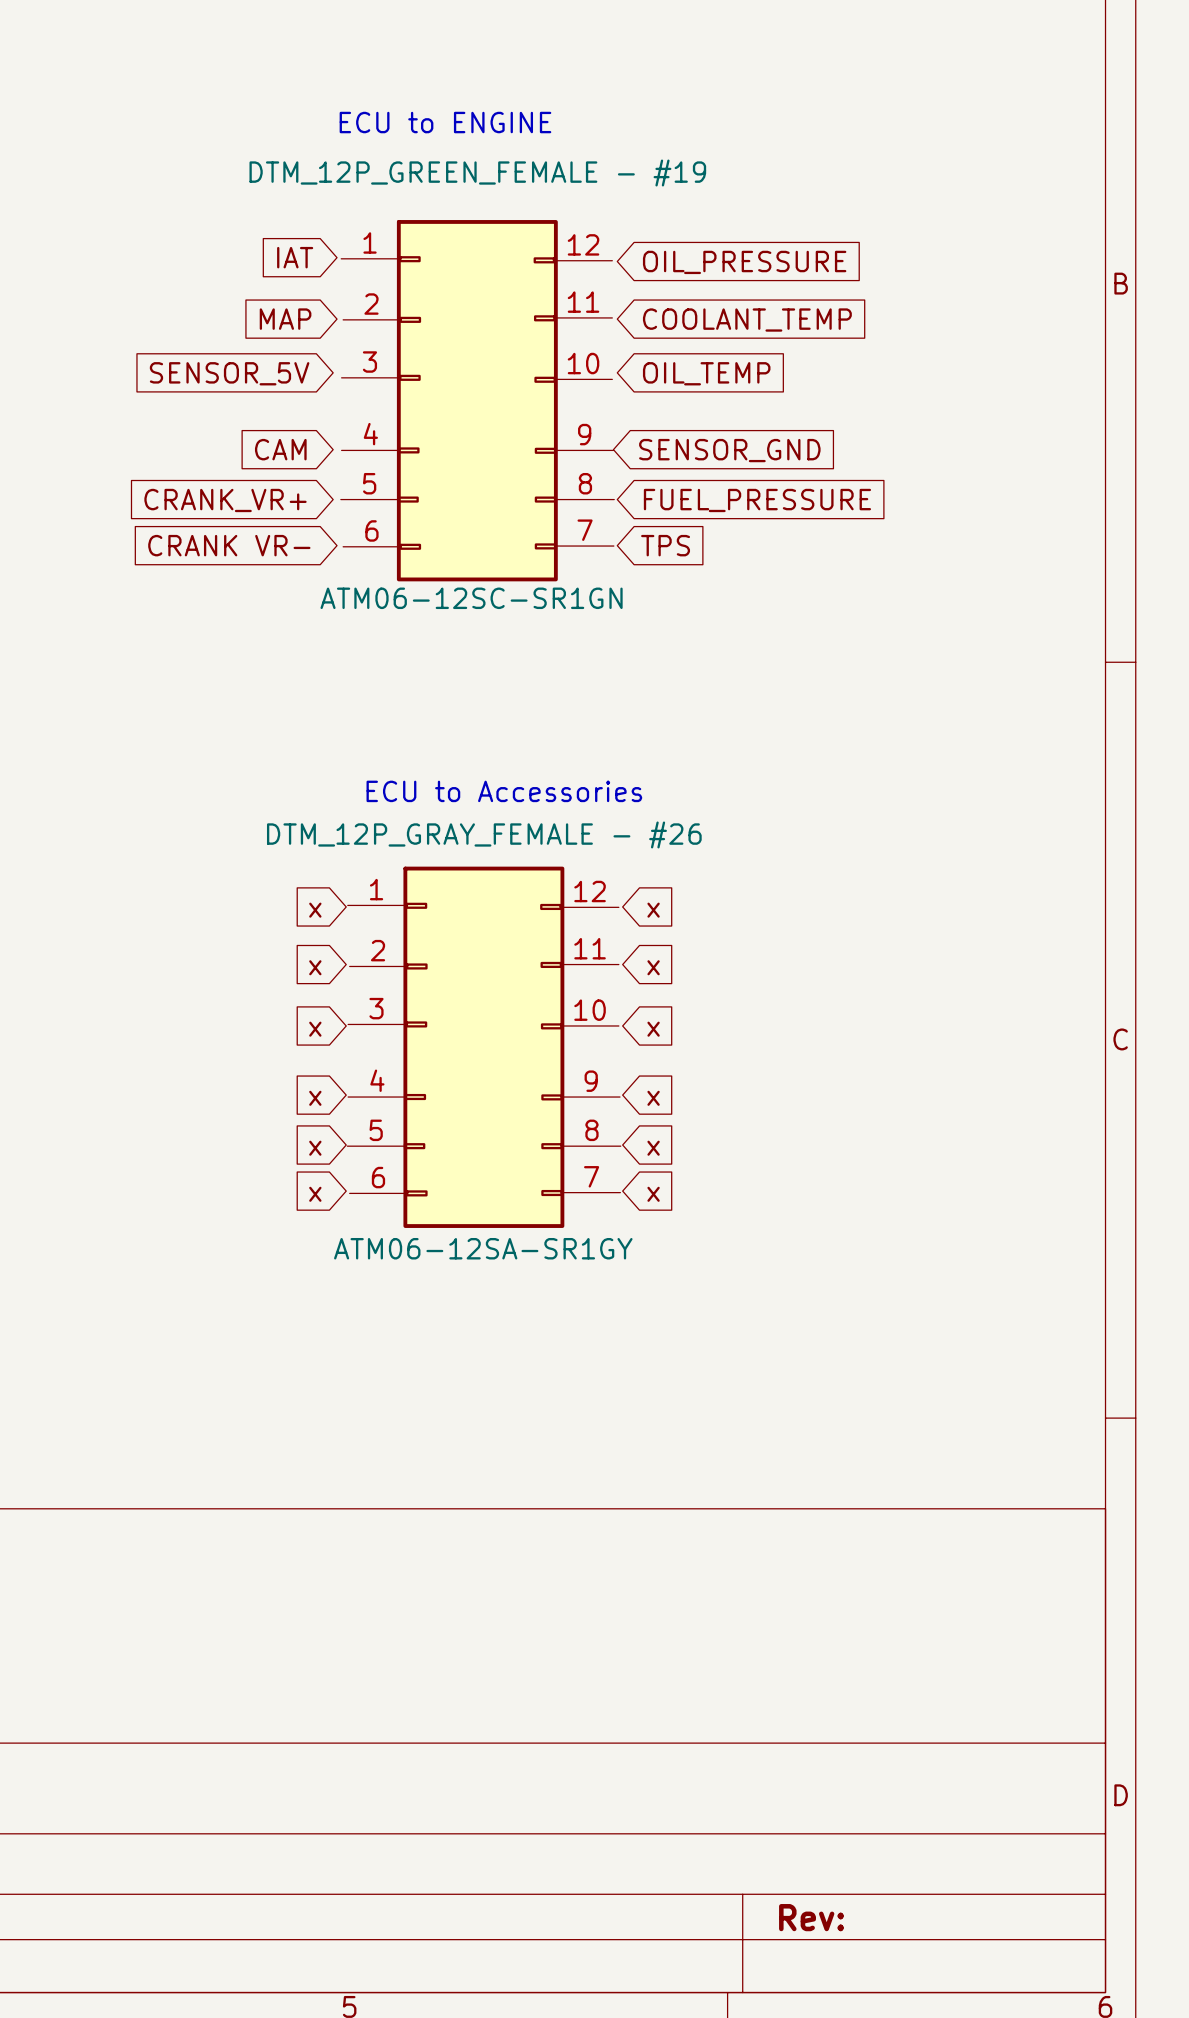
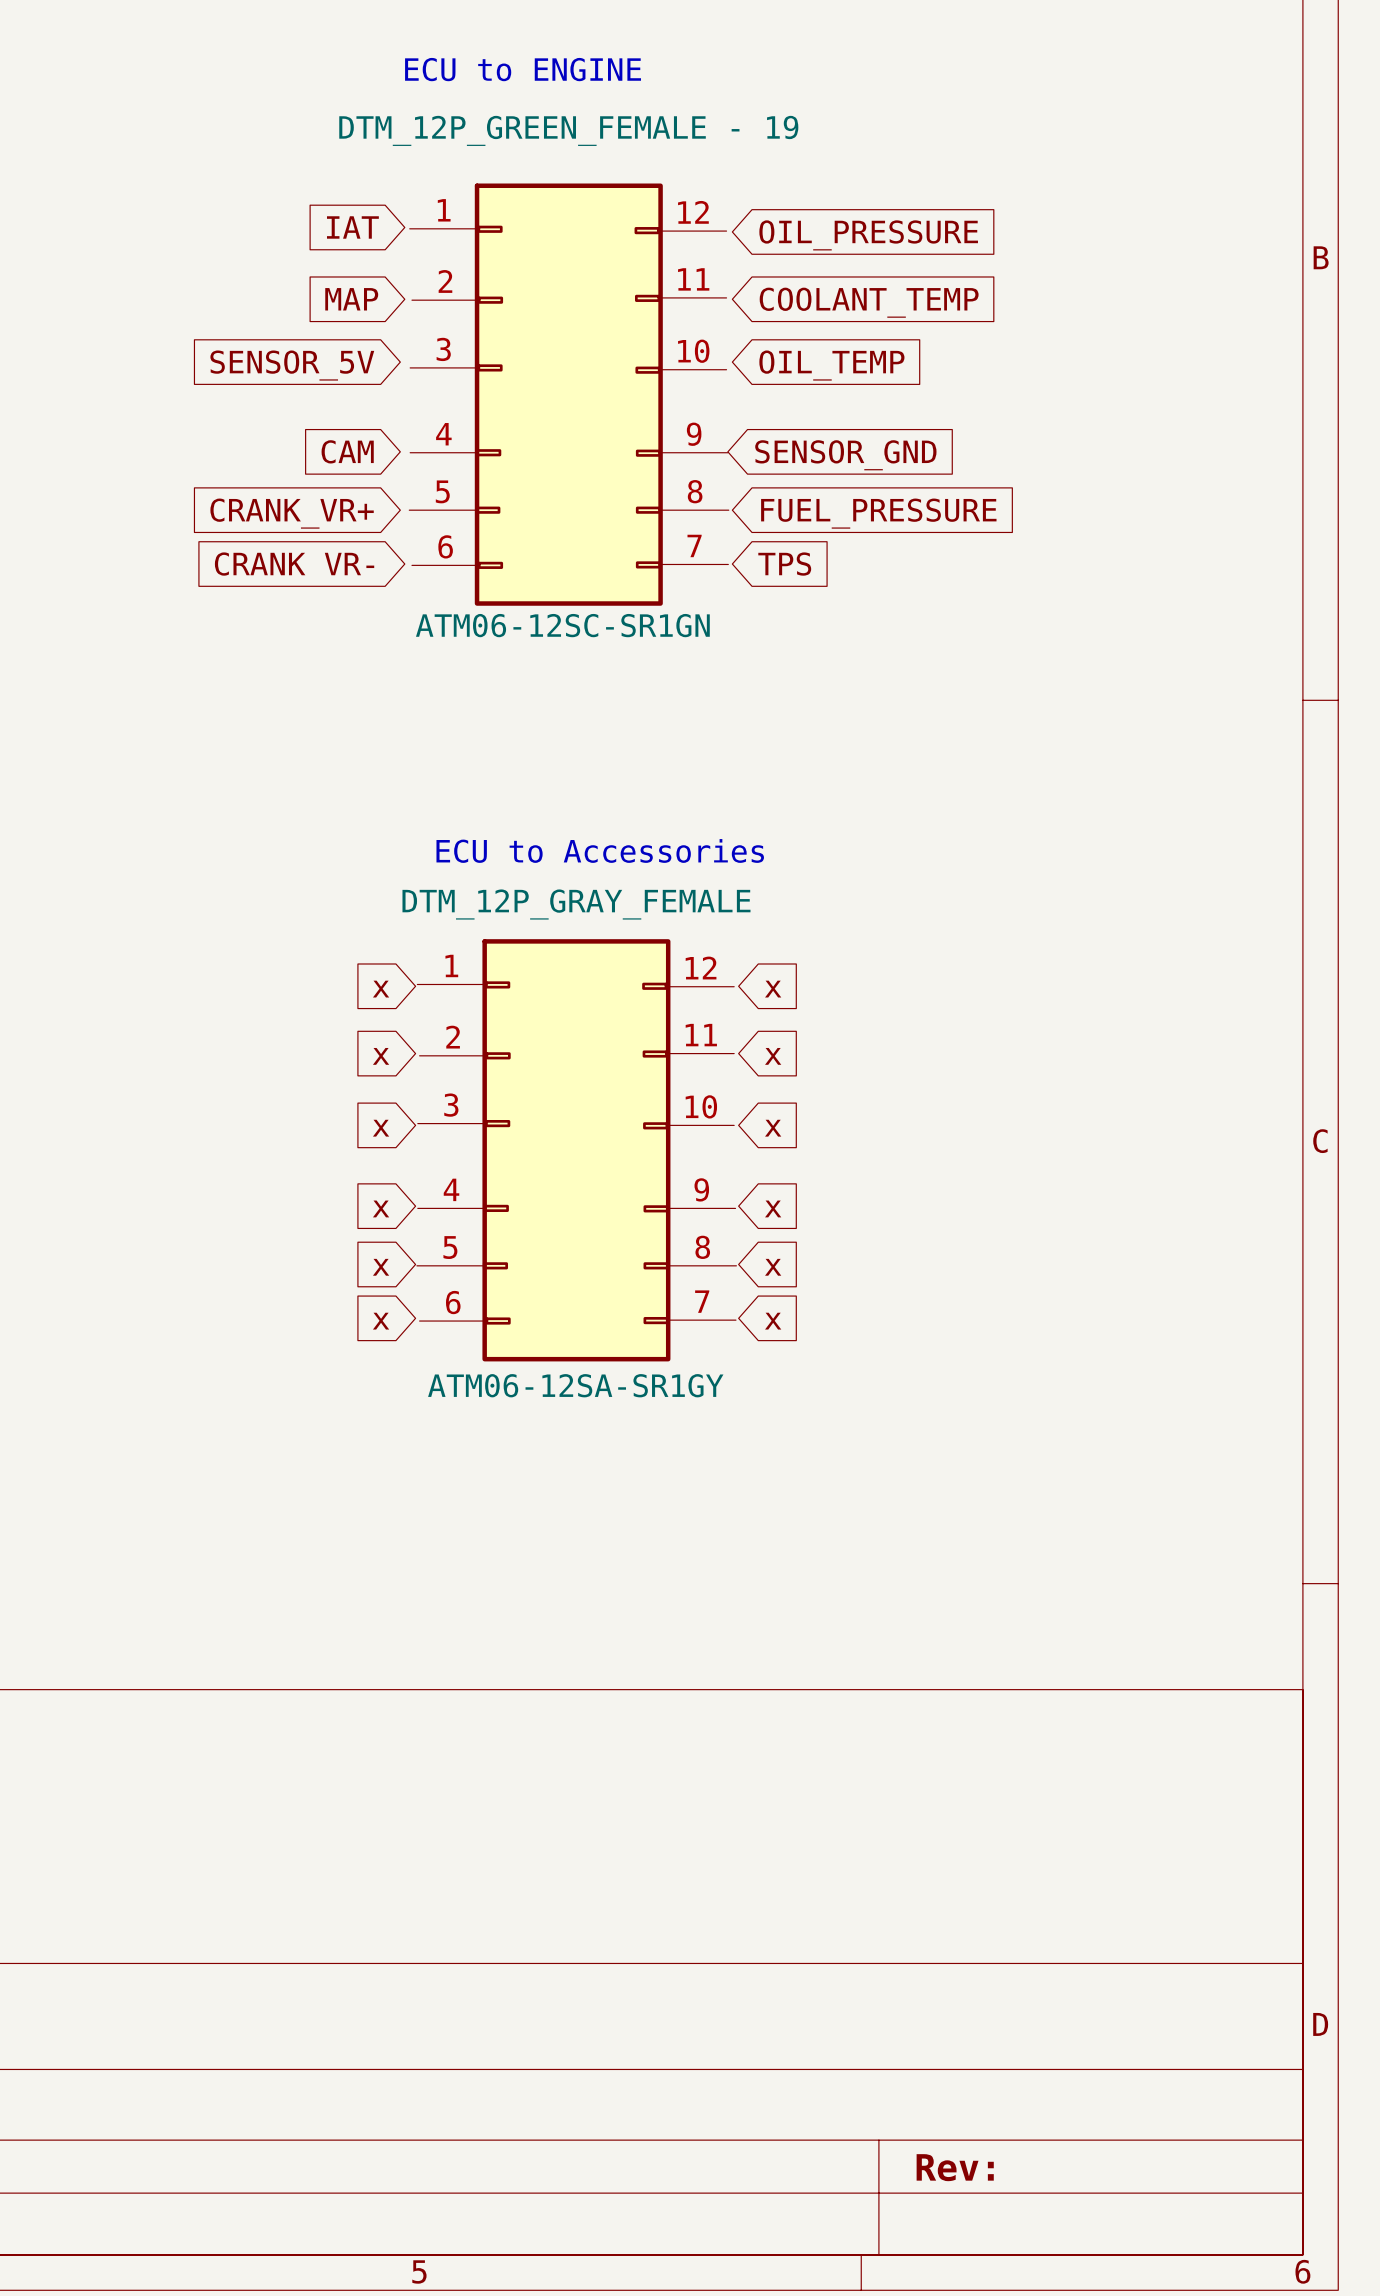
part value: DTM_12P_GREEN_FEMALE - #19 (477, 173) -> DTM_12P_GREEN_FEMALE - 19 (568, 130)
part value: DTM_12P_GRAY_FEMALE - #26 (484, 834) -> DTM_12P_GRAY_FEMALE (576, 904)

